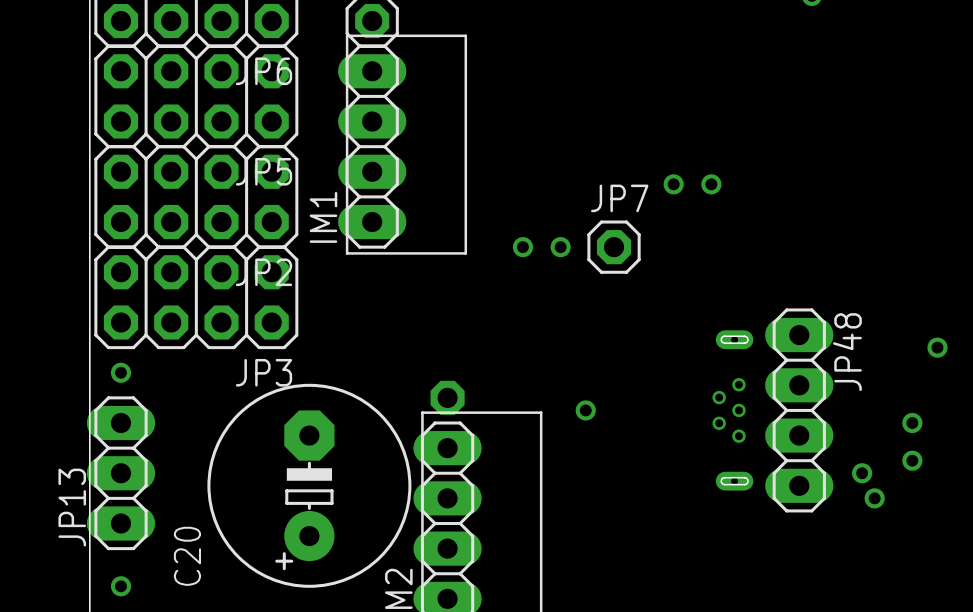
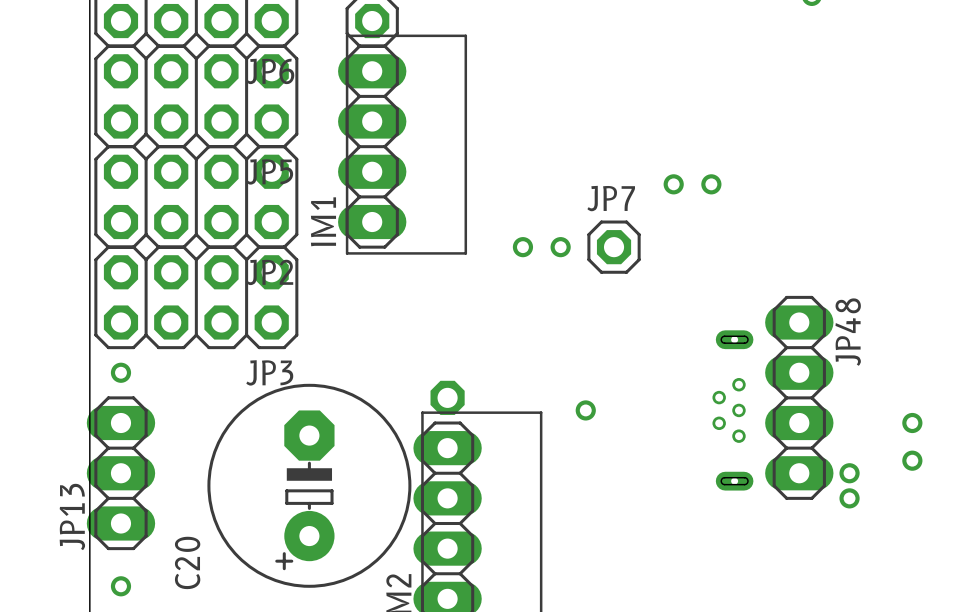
part: (937, 347) -> none
JP48 position: (799, 410) -> (799, 397)
part position: (862, 473) -> (849, 473)
part position: (874, 498) -> (849, 498)

